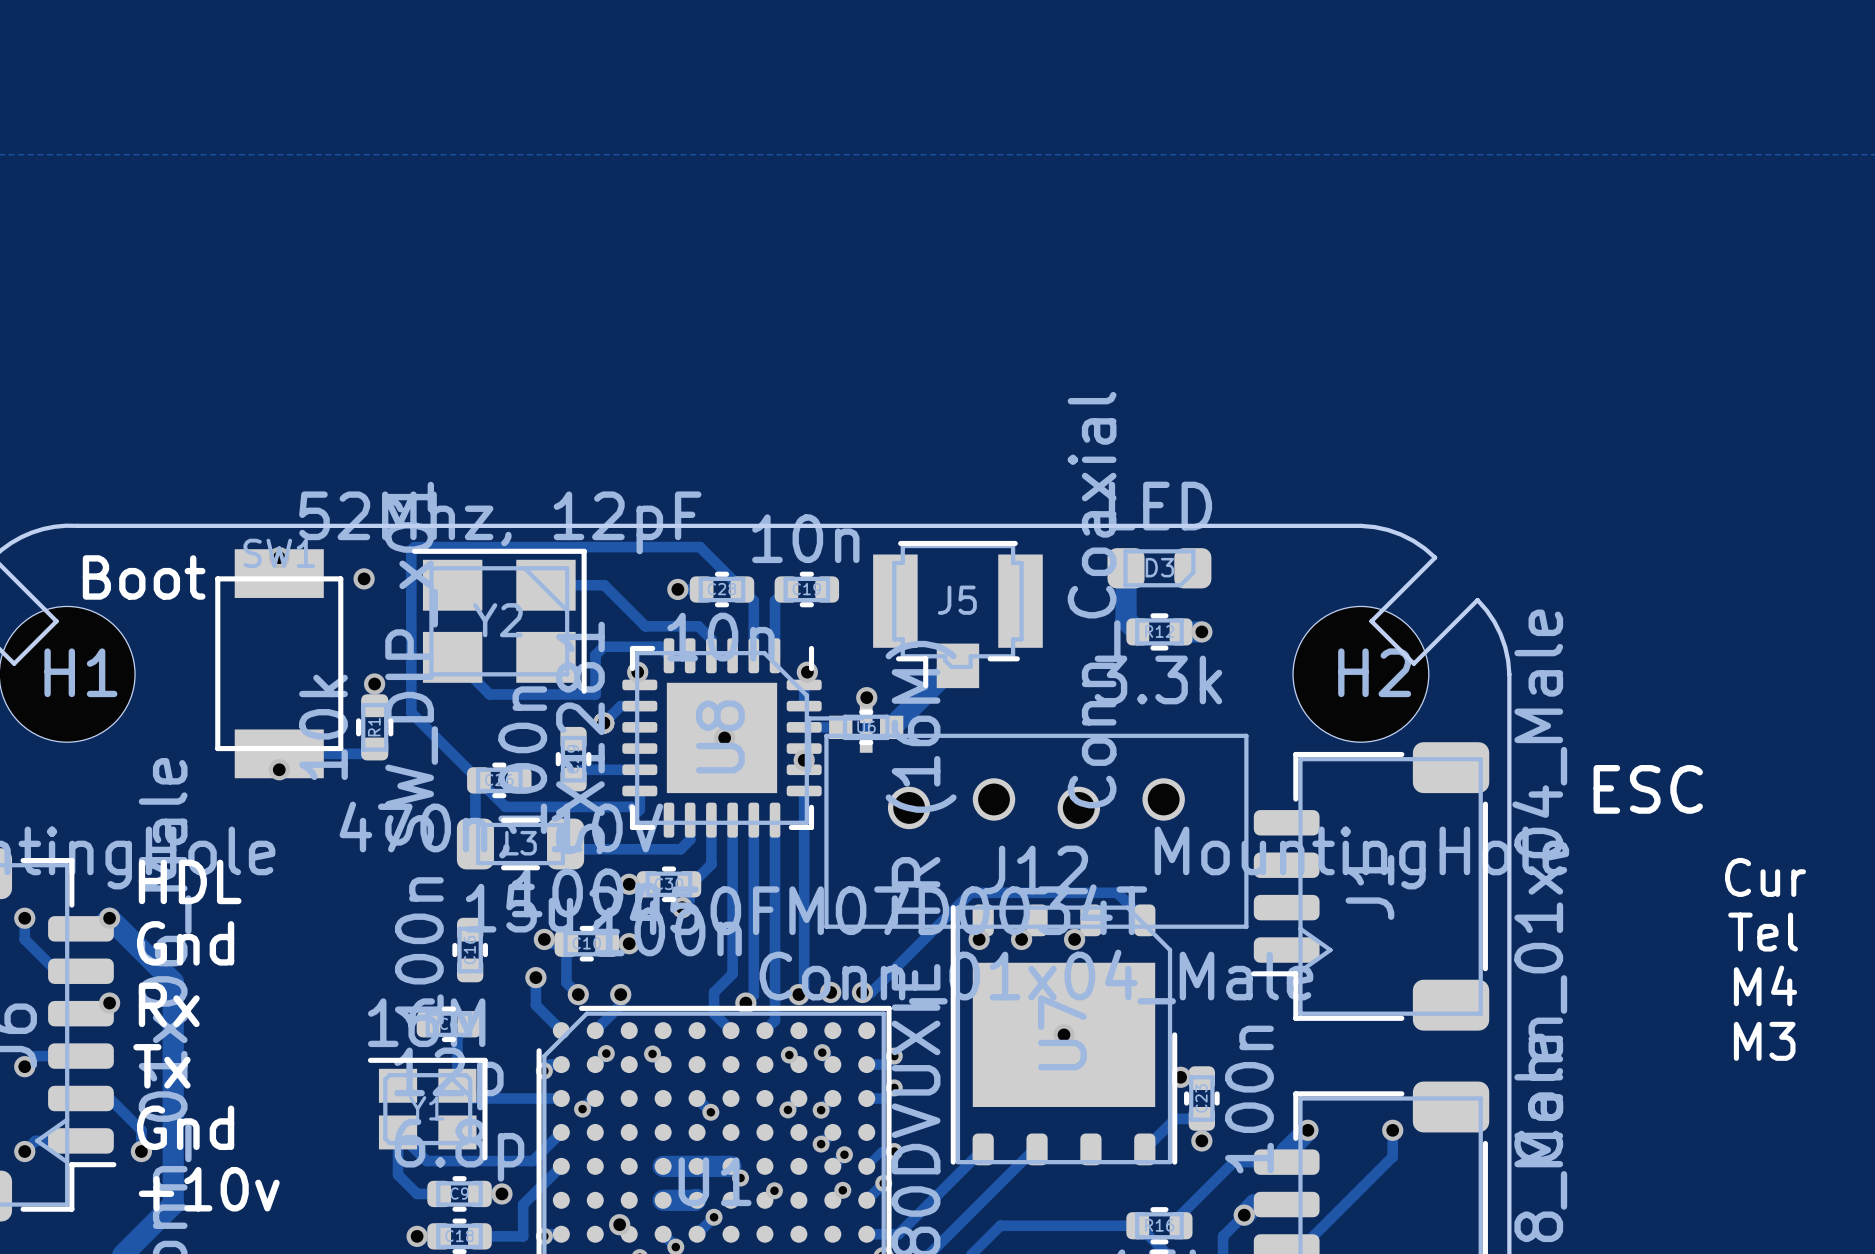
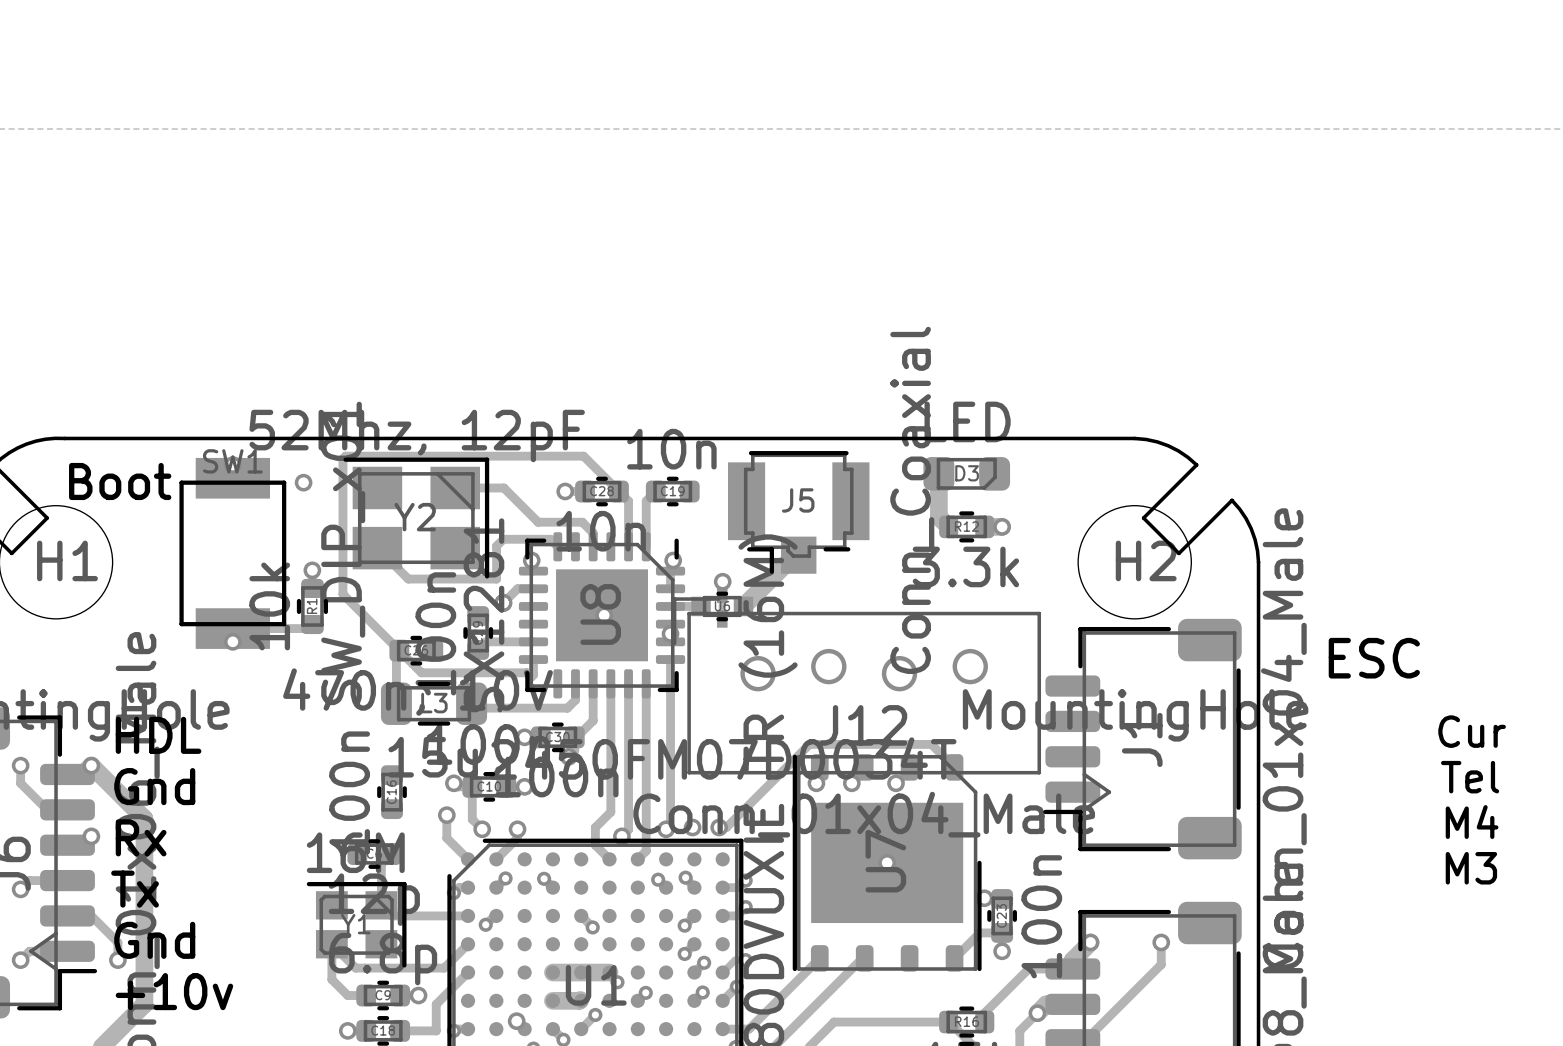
via: (787, 1109) -> none

